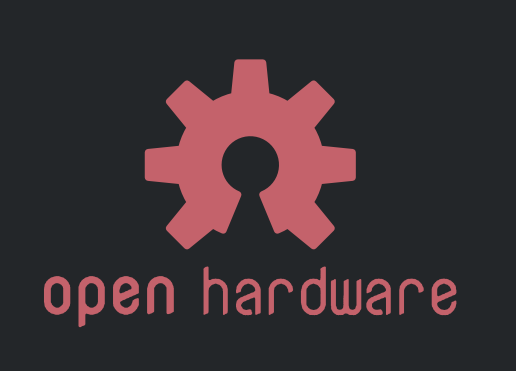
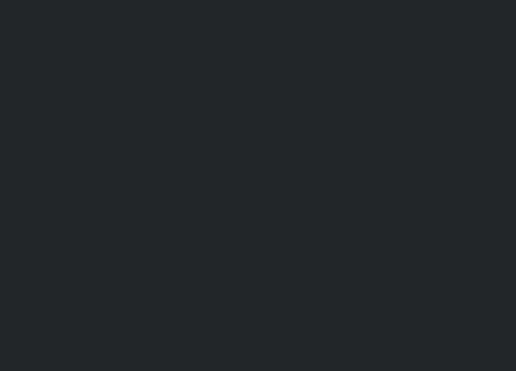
part: (250, 193) -> none

